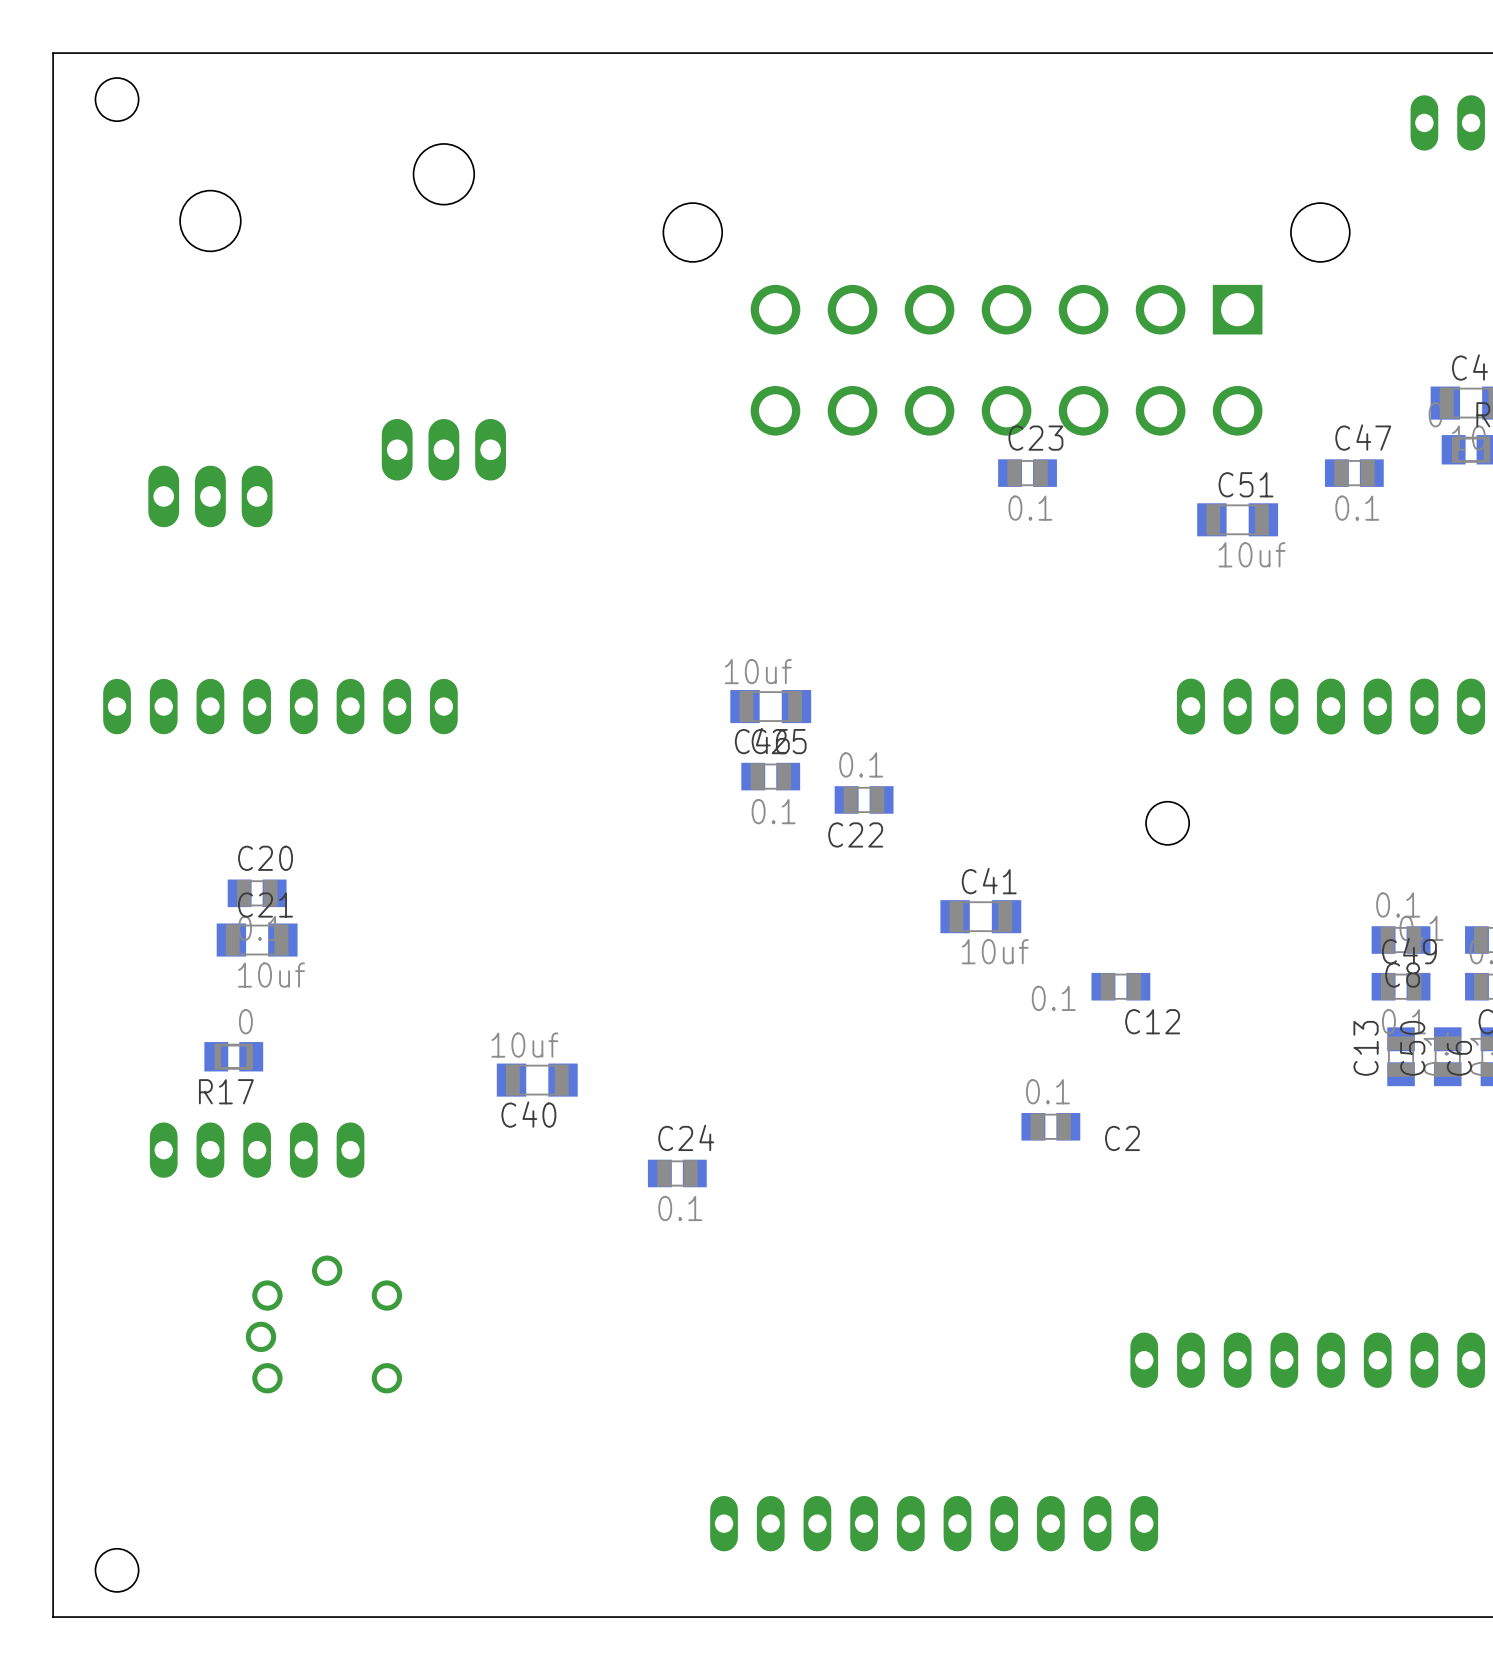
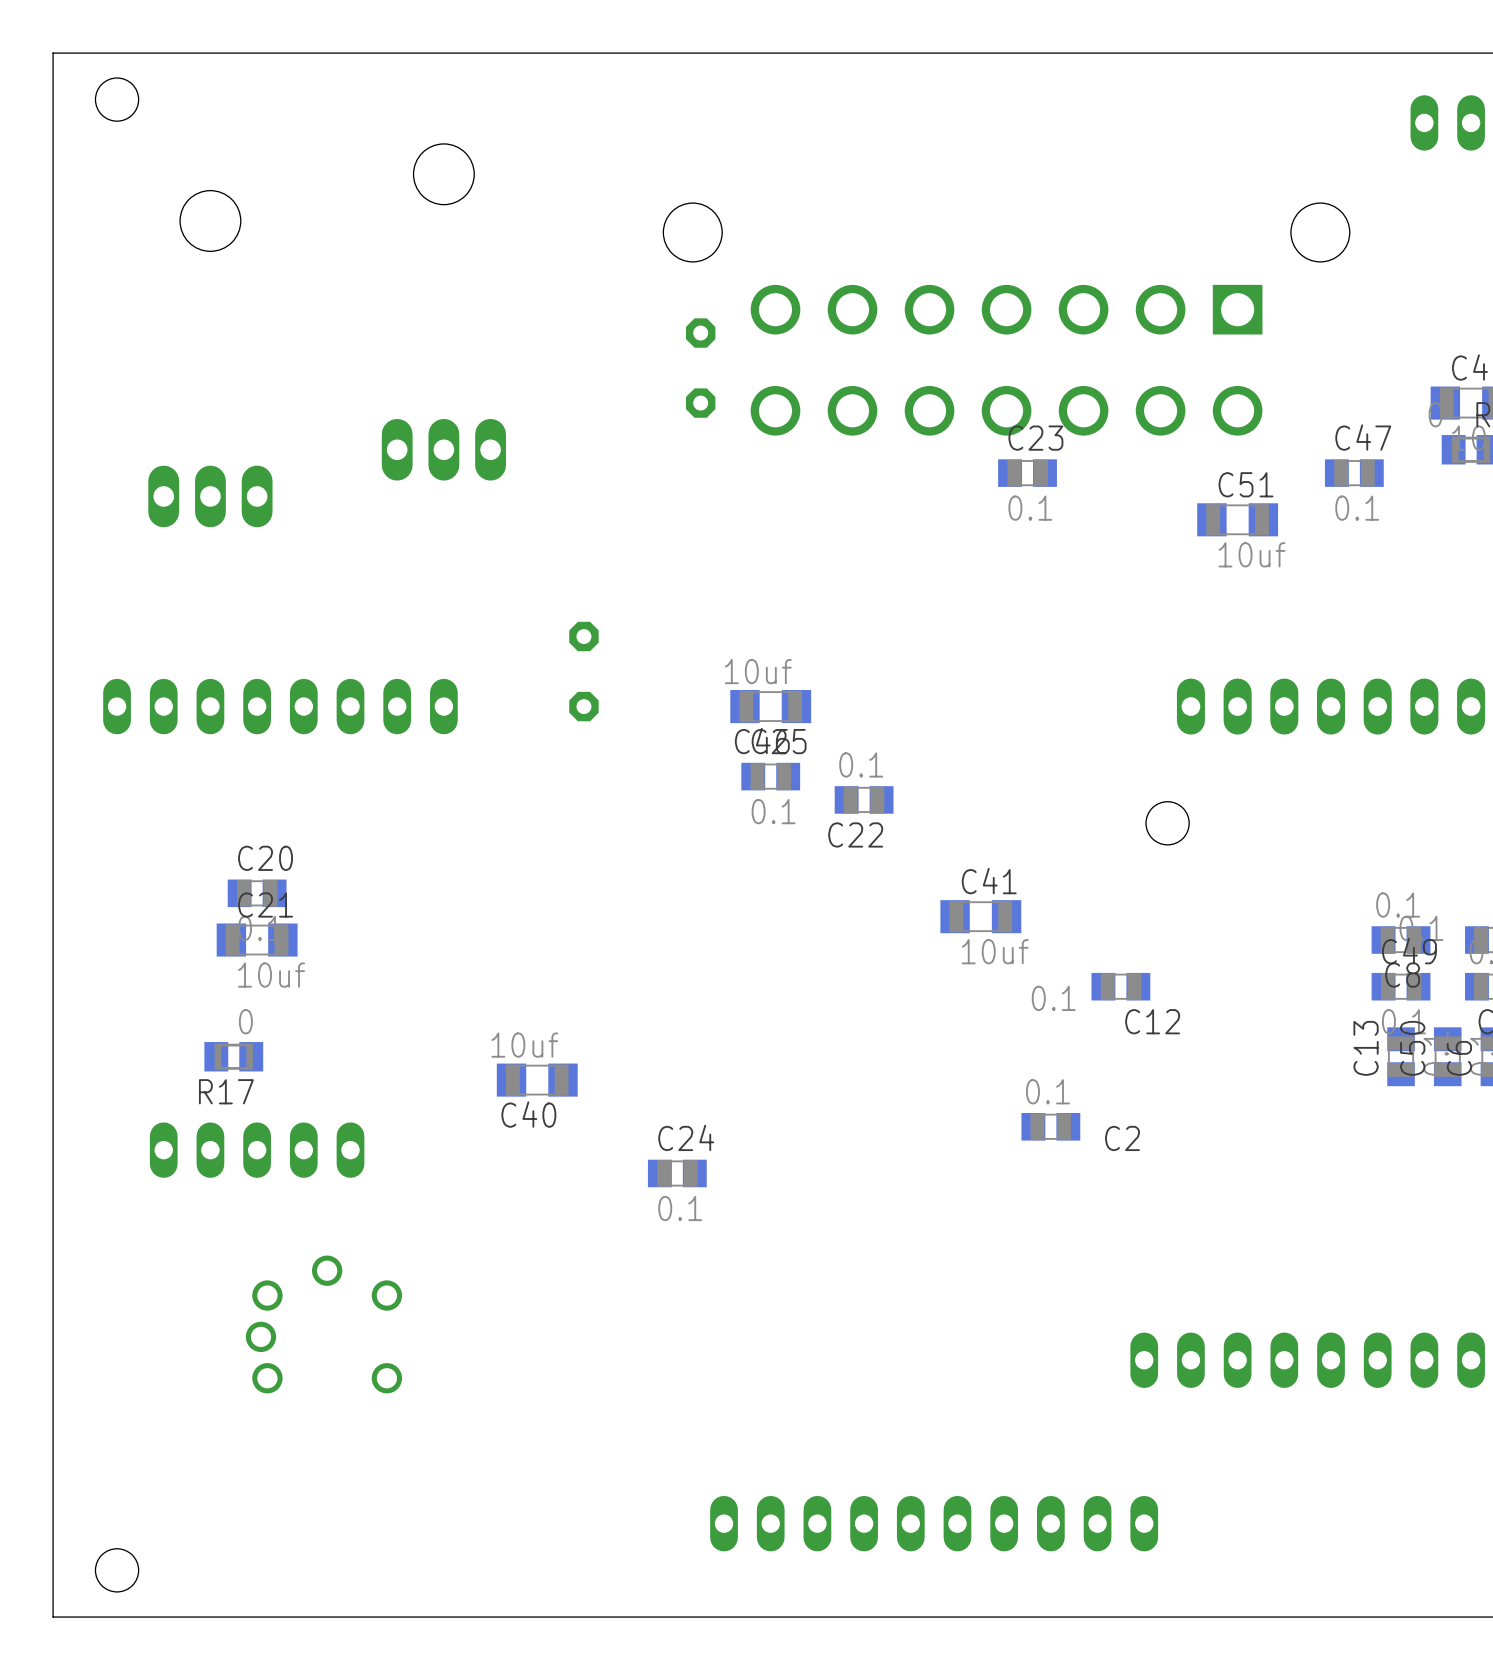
part: none -> (700, 333)
part: none -> (700, 403)
part: none -> (583, 636)
part: none -> (583, 706)

